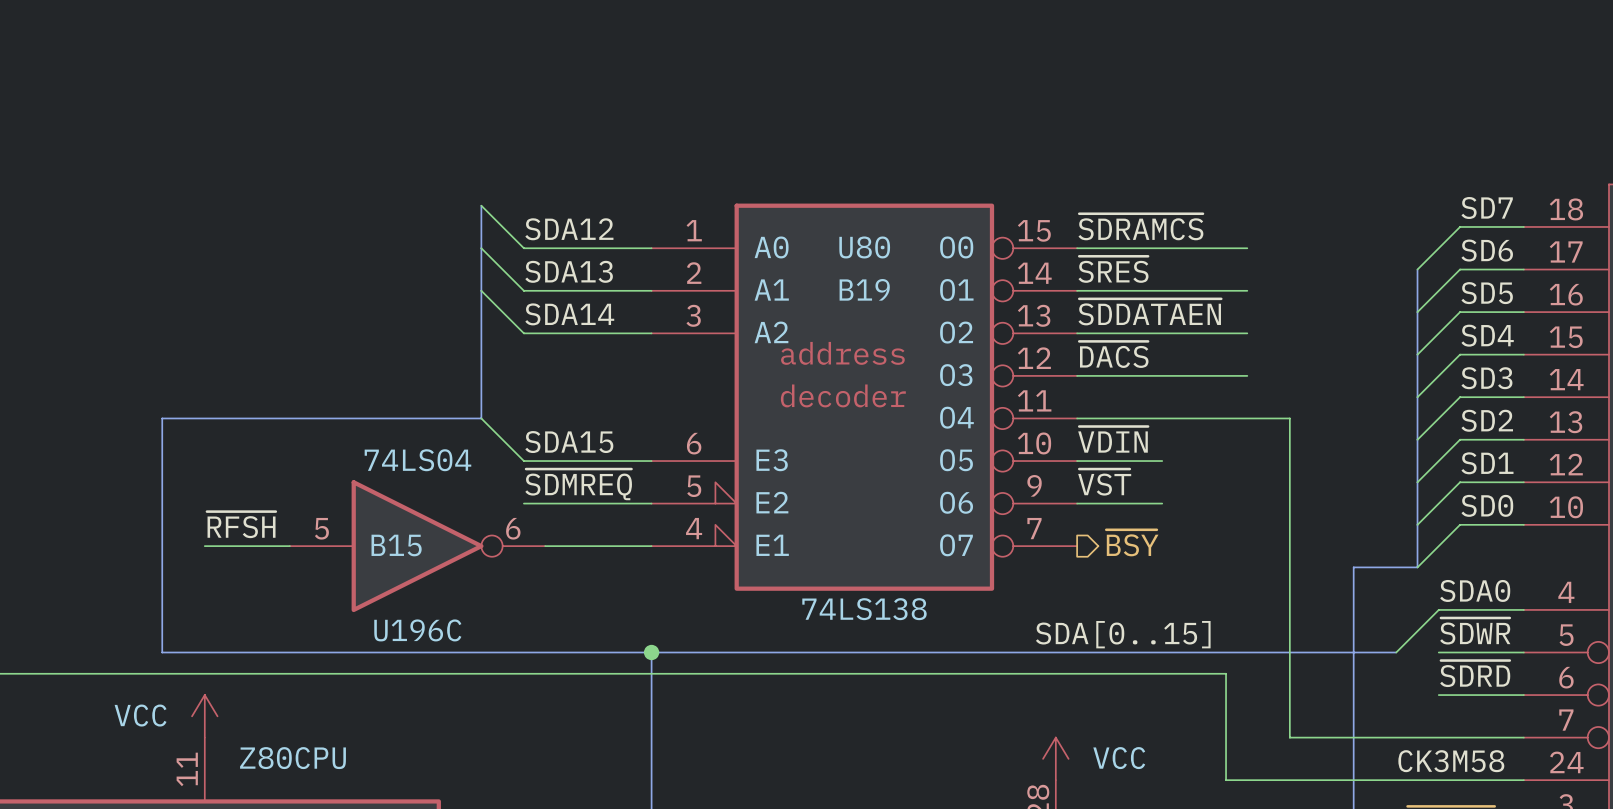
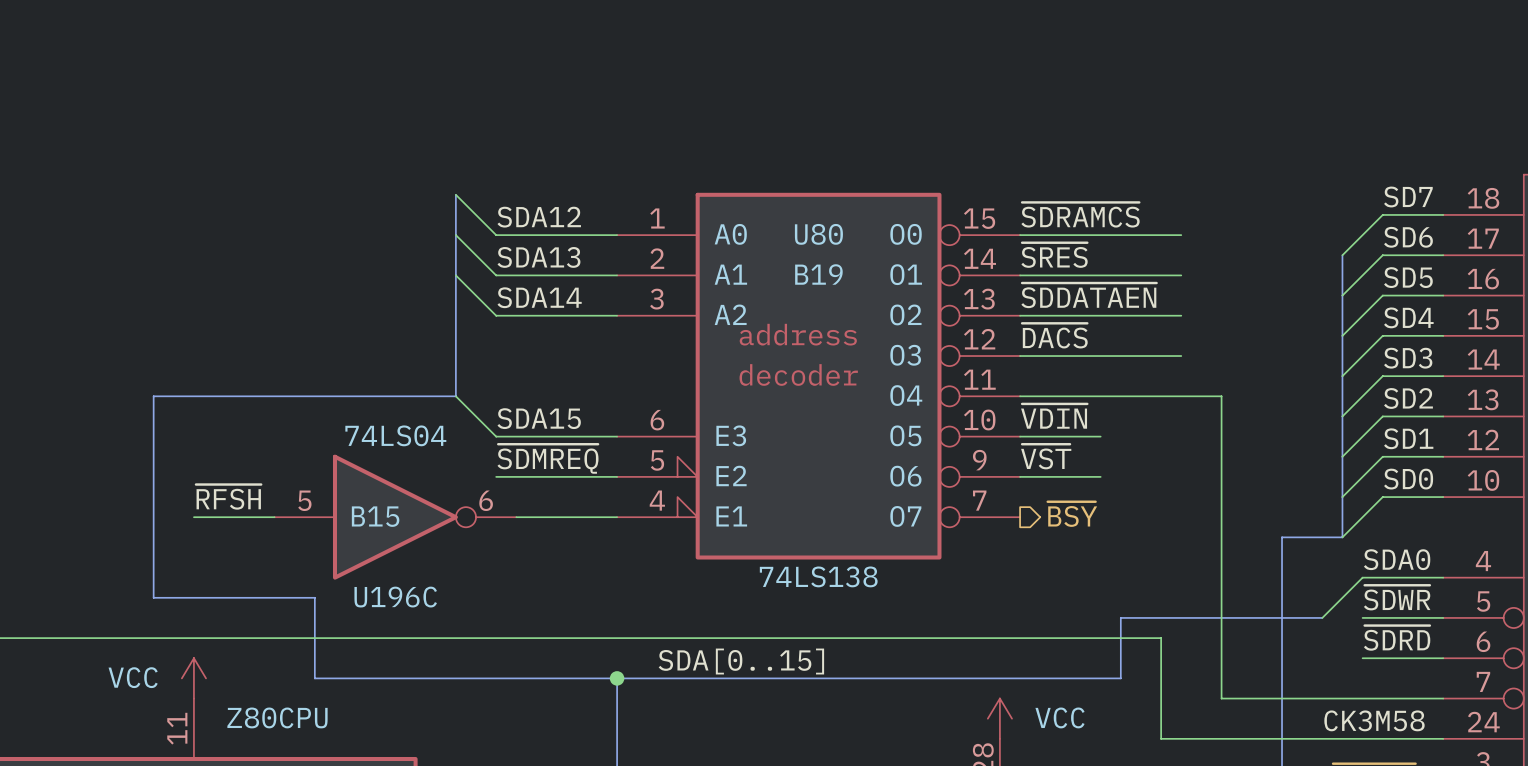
bus: (162, 631) (162, 652) (1183, 652) -> (153, 597) (314, 597) (314, 678) (1120, 678) (1120, 617)
label position: SDA[0..15] (1123, 634) -> SDA[0..15] (741, 661)
bus: (651, 652) (651, 716) -> none
junction position: (651, 652) -> (617, 678)

